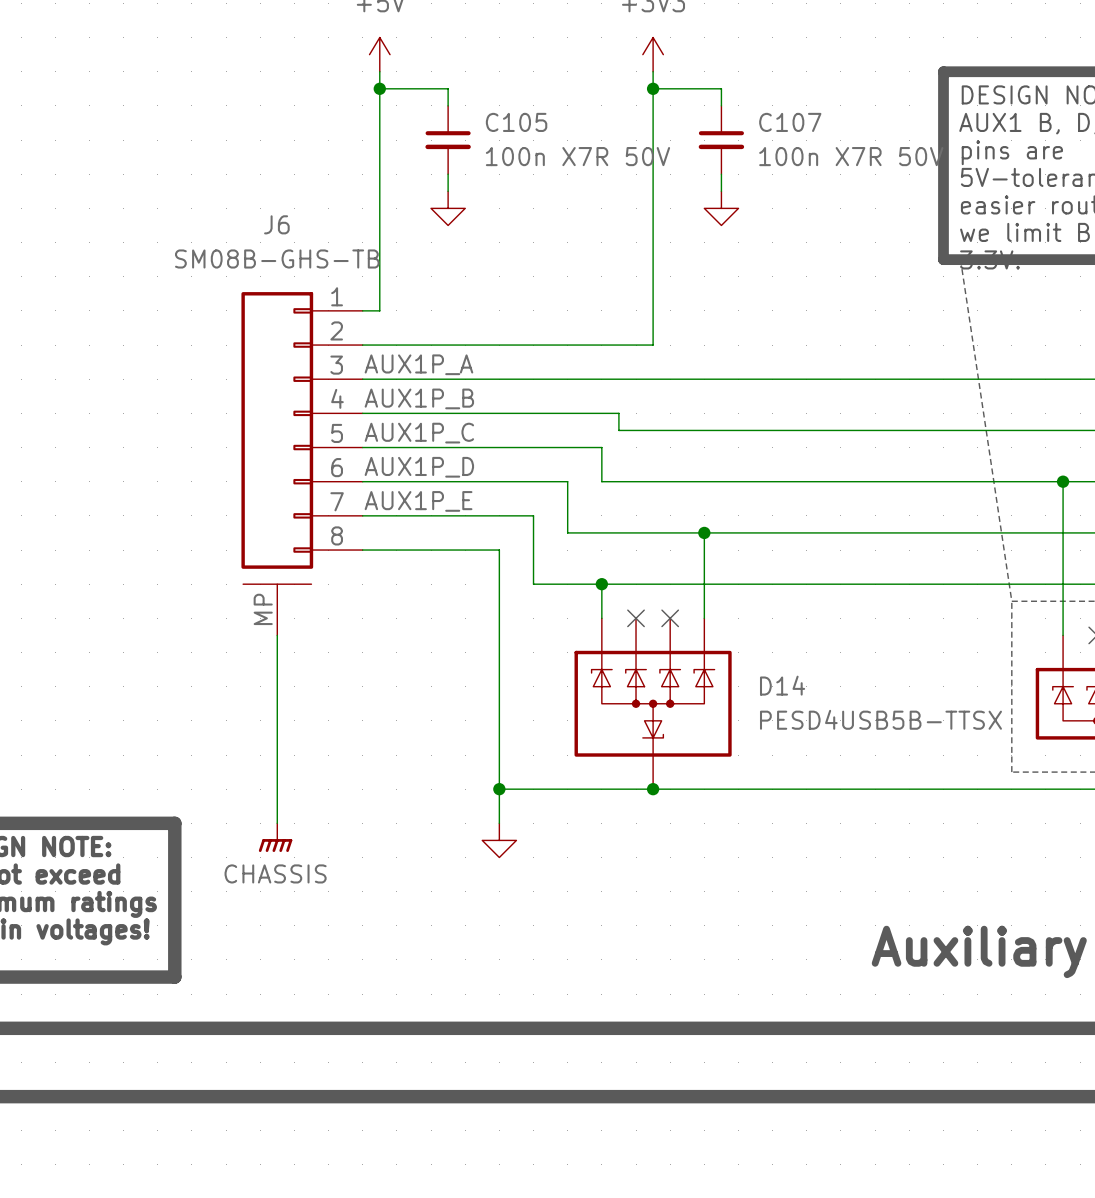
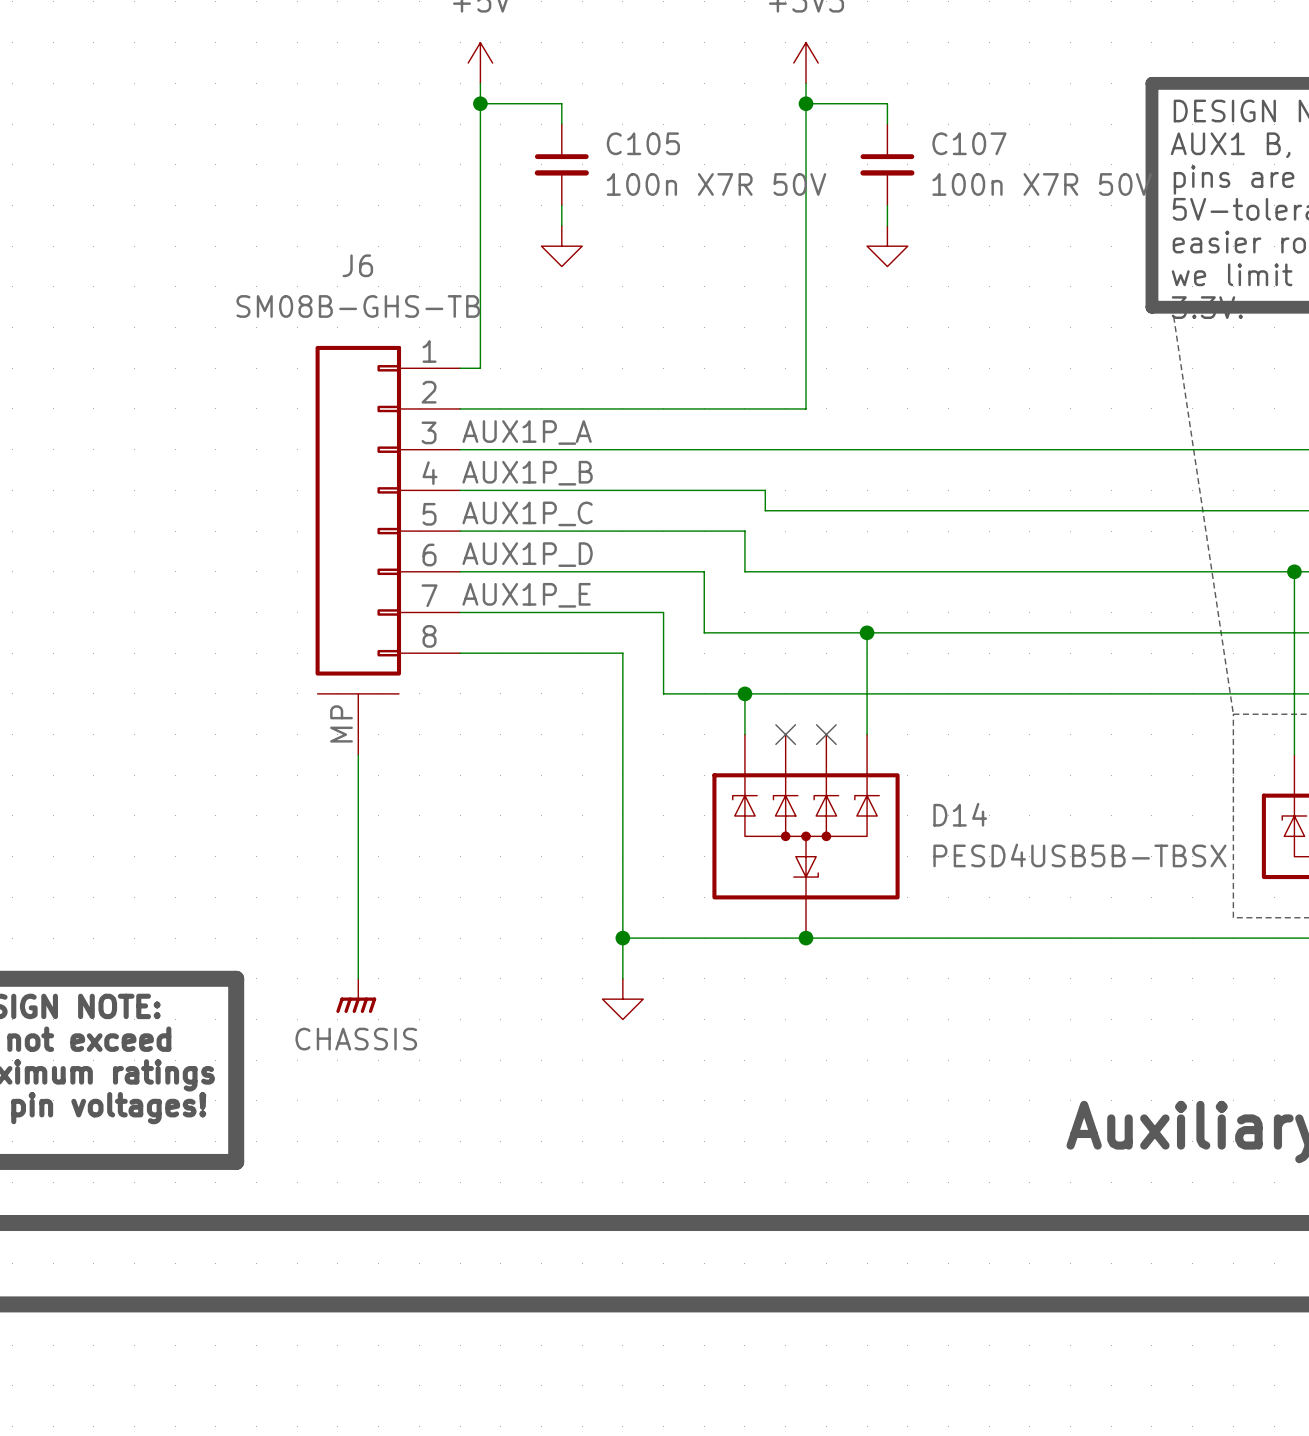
D14 value: PESD4USB5B-TTSX (880, 719) -> PESD4USB5B-TBSX (1079, 855)

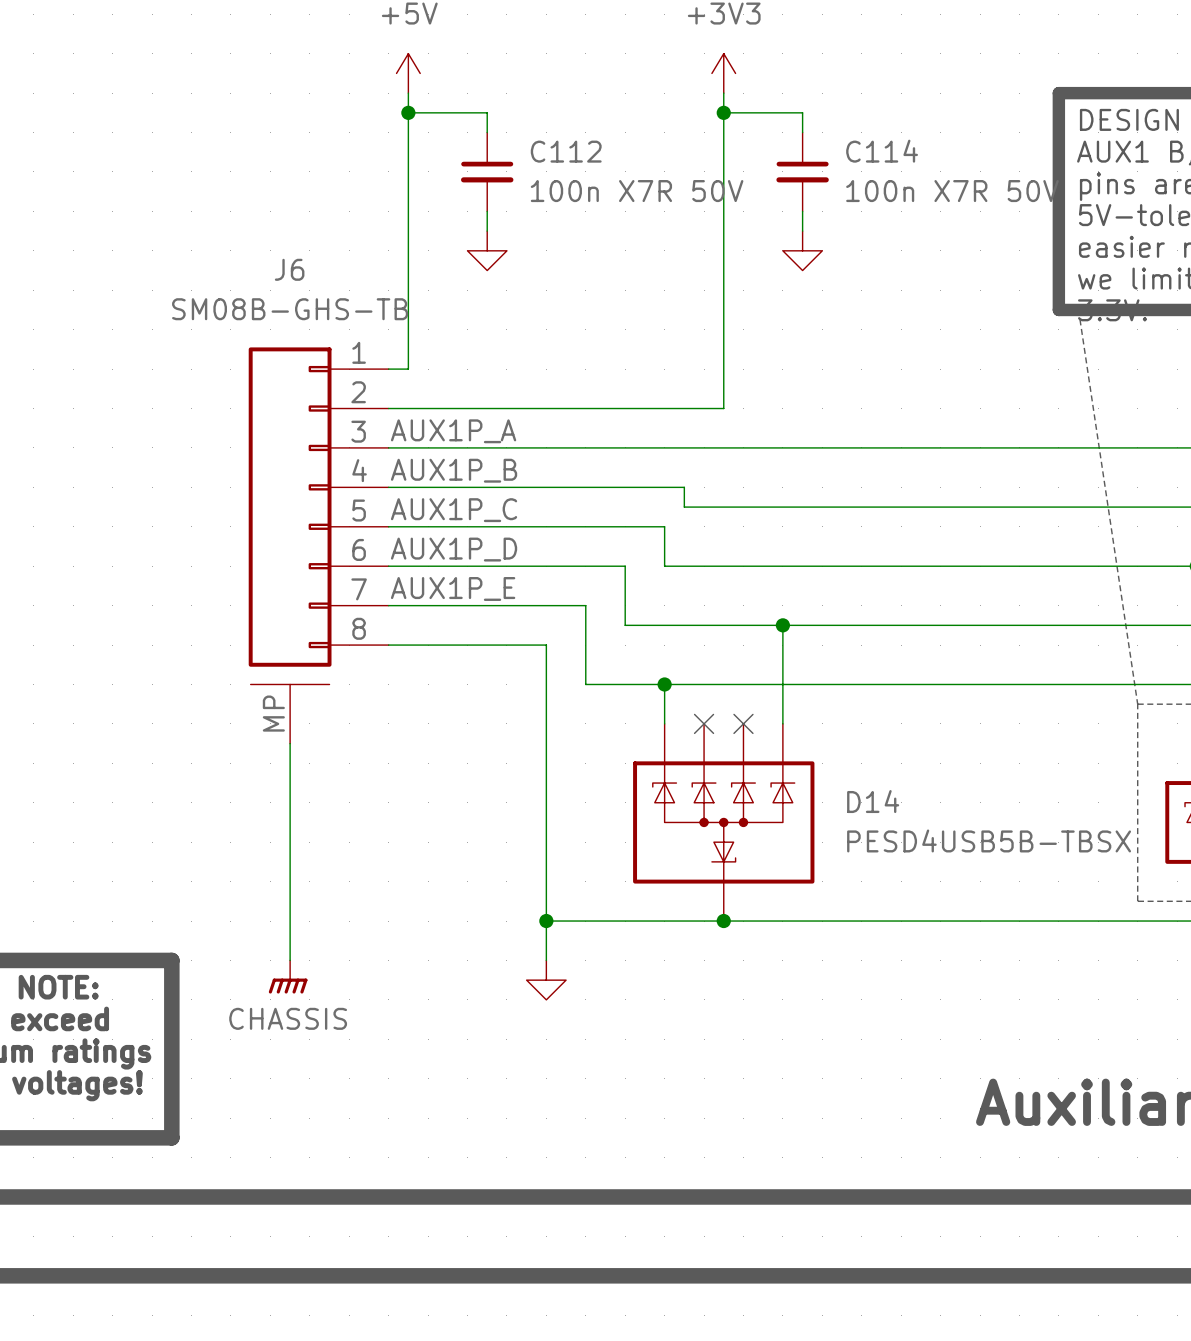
C105 name: C105 (643, 143) -> C112 (566, 151)
C107 name: C107 (969, 143) -> C114 (882, 151)

